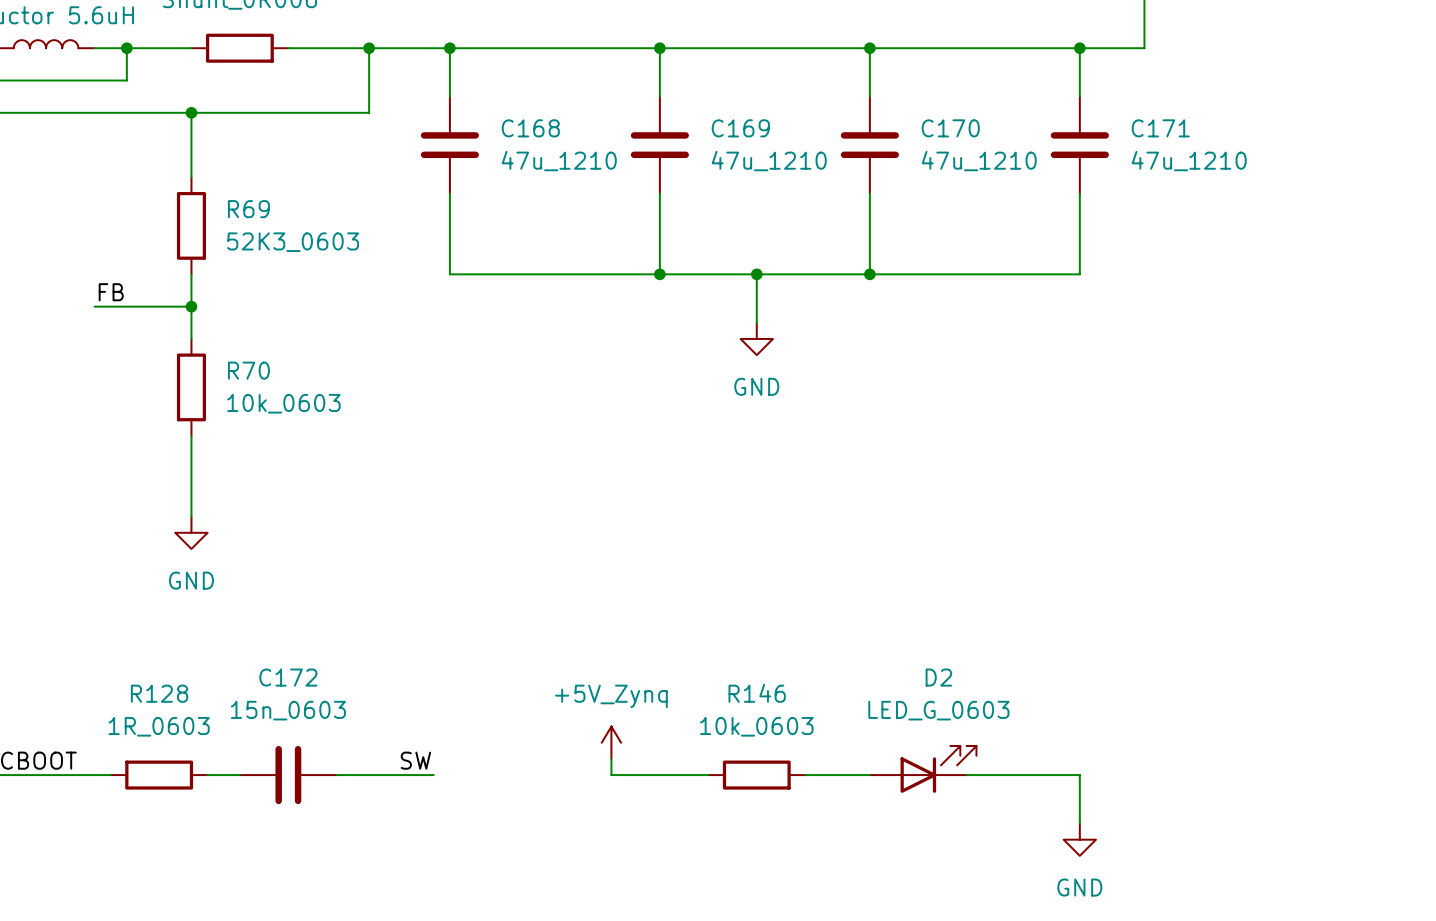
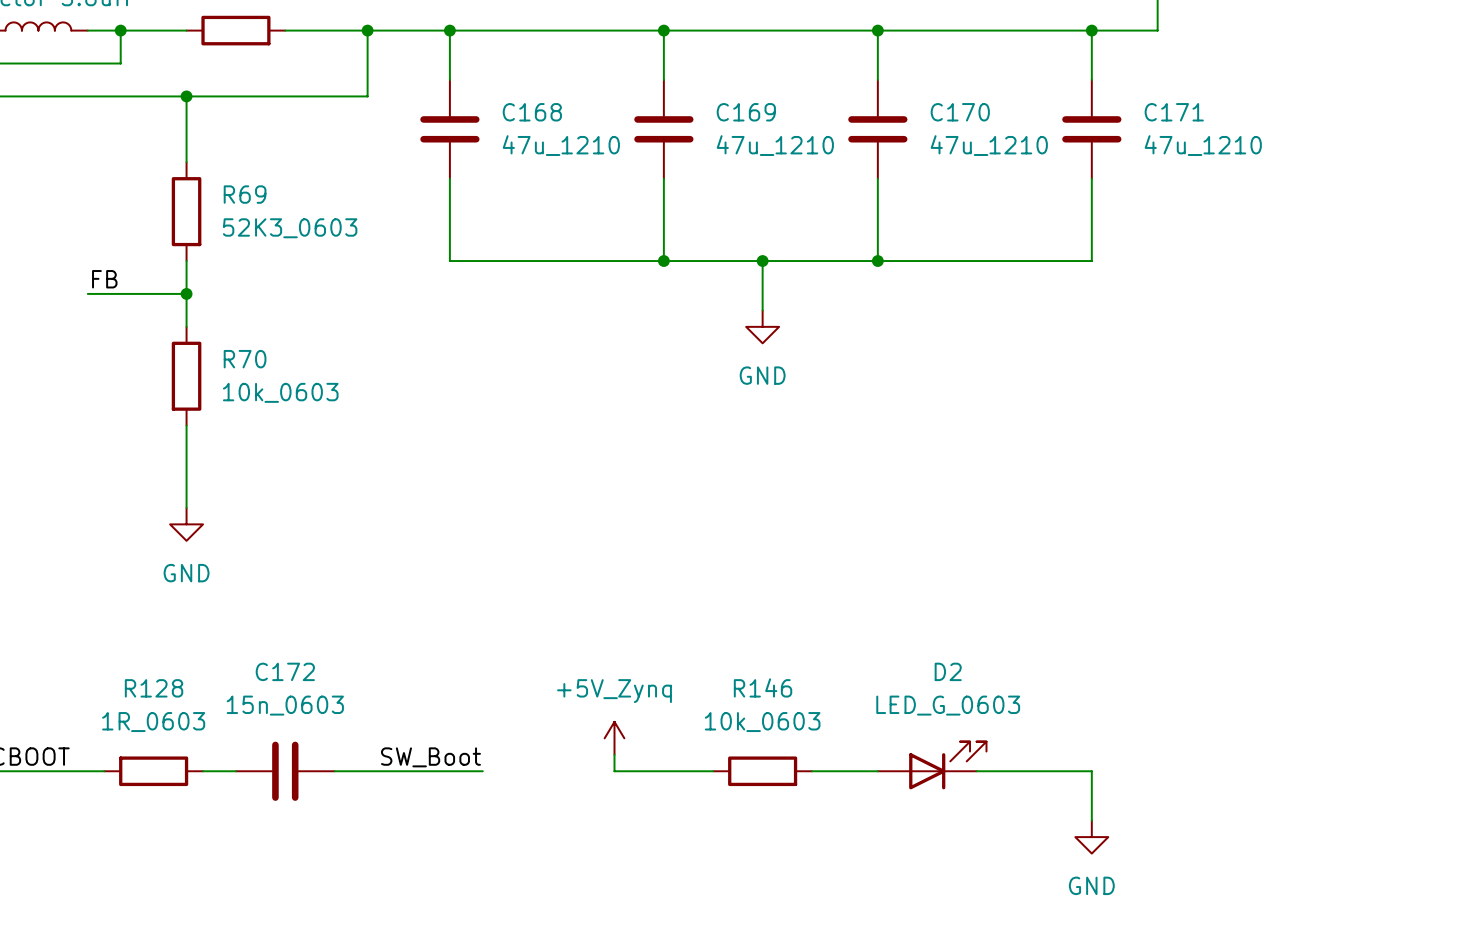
label: SW (415, 760) -> none
label: none -> SW_Boot (430, 757)
wire: none -> (433, 771) (482, 771)

